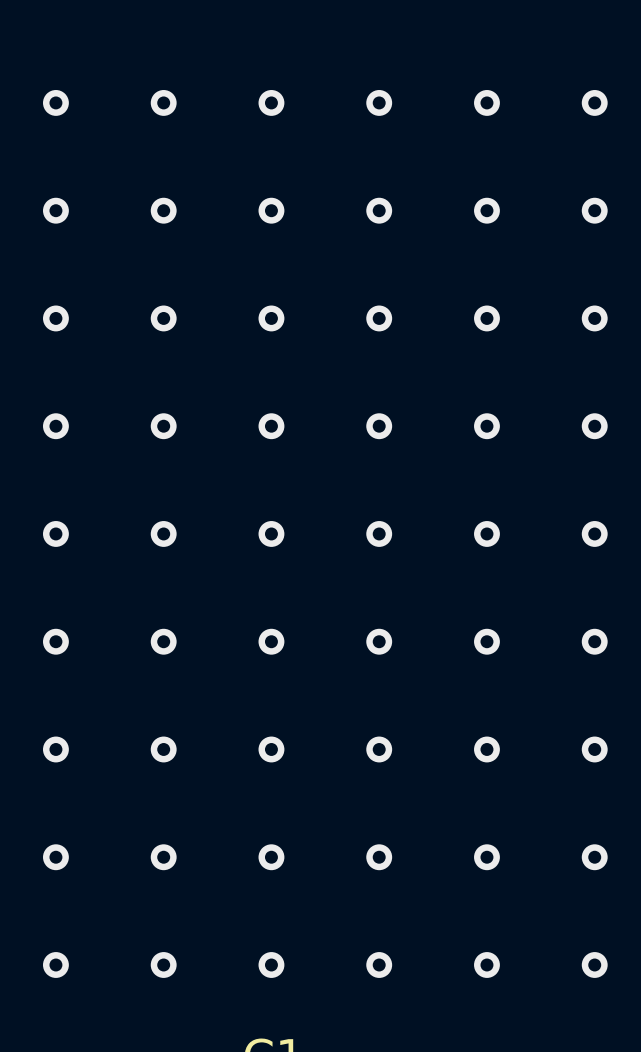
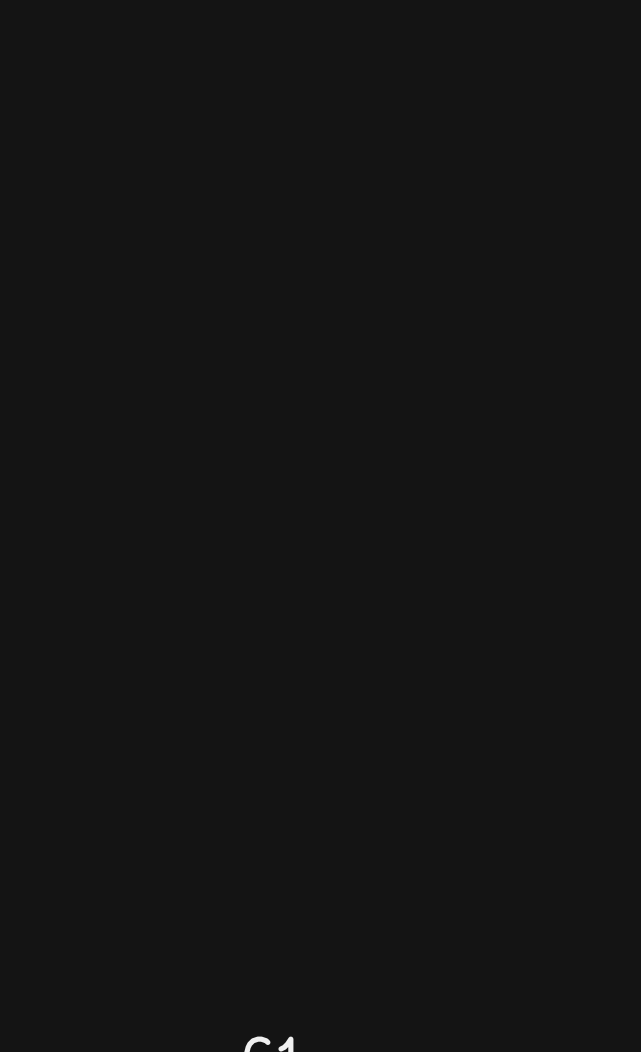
via: (55, 102) -> none
via: (163, 102) -> none
via: (271, 102) -> none
via: (379, 102) -> none
via: (486, 102) -> none
via: (594, 102) -> none
via: (55, 210) -> none
via: (163, 210) -> none
via: (271, 210) -> none
via: (379, 210) -> none
via: (486, 210) -> none
via: (594, 210) -> none
via: (55, 318) -> none
via: (163, 318) -> none
via: (271, 318) -> none
via: (379, 318) -> none
via: (486, 318) -> none
via: (594, 318) -> none
via: (55, 426) -> none
via: (163, 426) -> none
via: (271, 426) -> none
via: (379, 426) -> none
via: (486, 426) -> none
via: (594, 426) -> none
via: (55, 533) -> none
via: (163, 533) -> none
via: (271, 533) -> none
via: (379, 533) -> none
via: (486, 533) -> none
via: (594, 533) -> none
via: (55, 641) -> none
via: (163, 641) -> none
via: (271, 641) -> none
via: (379, 641) -> none
via: (486, 641) -> none
via: (594, 641) -> none
via: (55, 749) -> none
via: (163, 749) -> none
via: (271, 749) -> none
via: (379, 749) -> none
via: (486, 749) -> none
via: (594, 749) -> none
via: (55, 857) -> none
via: (163, 857) -> none
via: (271, 857) -> none
via: (379, 857) -> none
via: (486, 857) -> none
via: (594, 857) -> none
via: (55, 965) -> none
via: (163, 965) -> none
via: (271, 965) -> none
via: (379, 965) -> none
via: (486, 965) -> none
via: (594, 965) -> none

